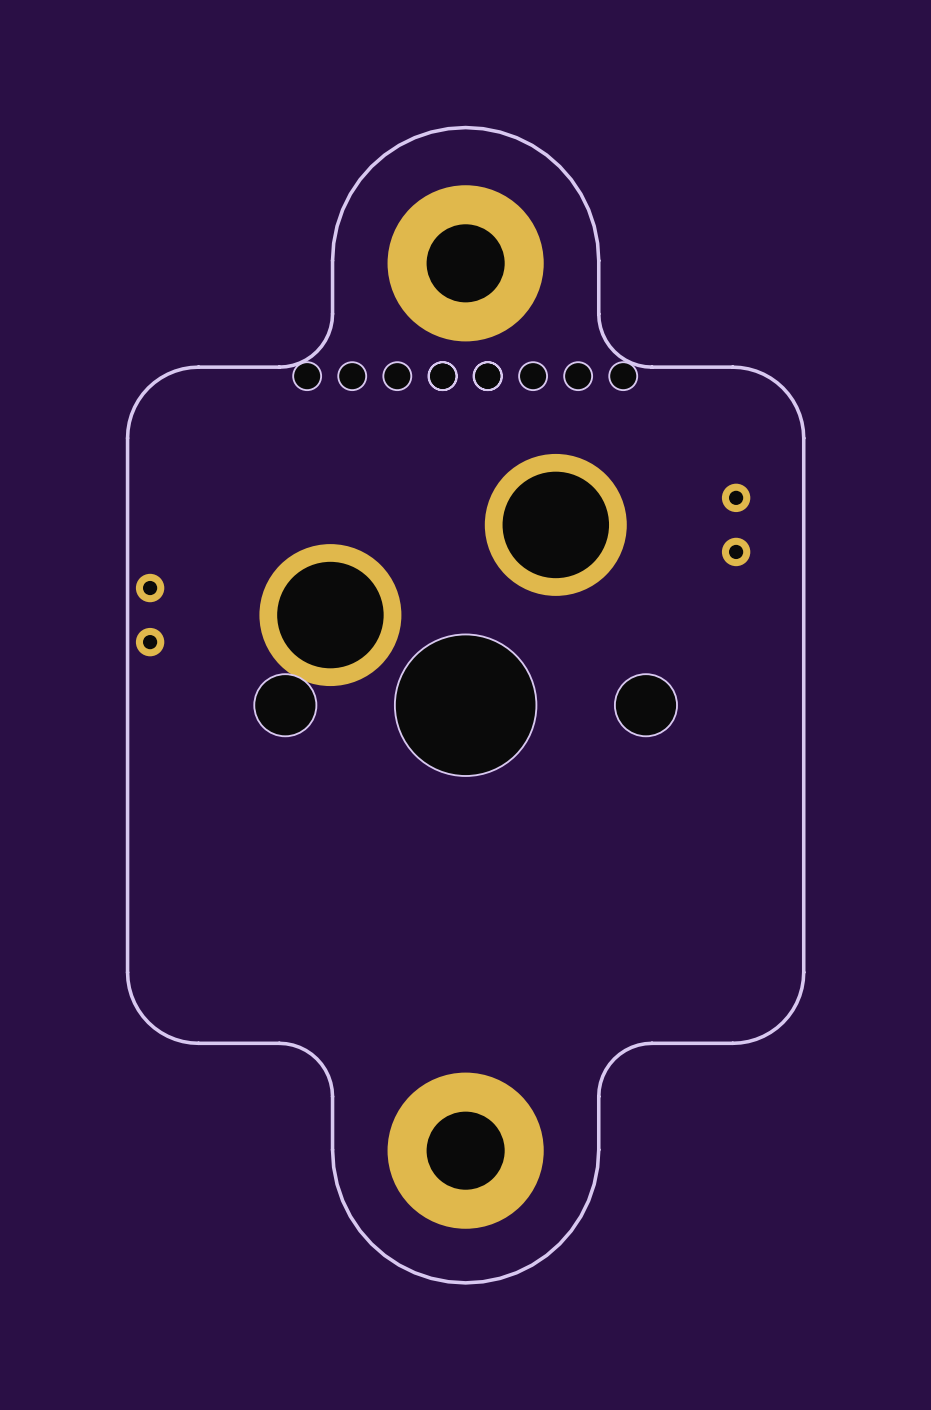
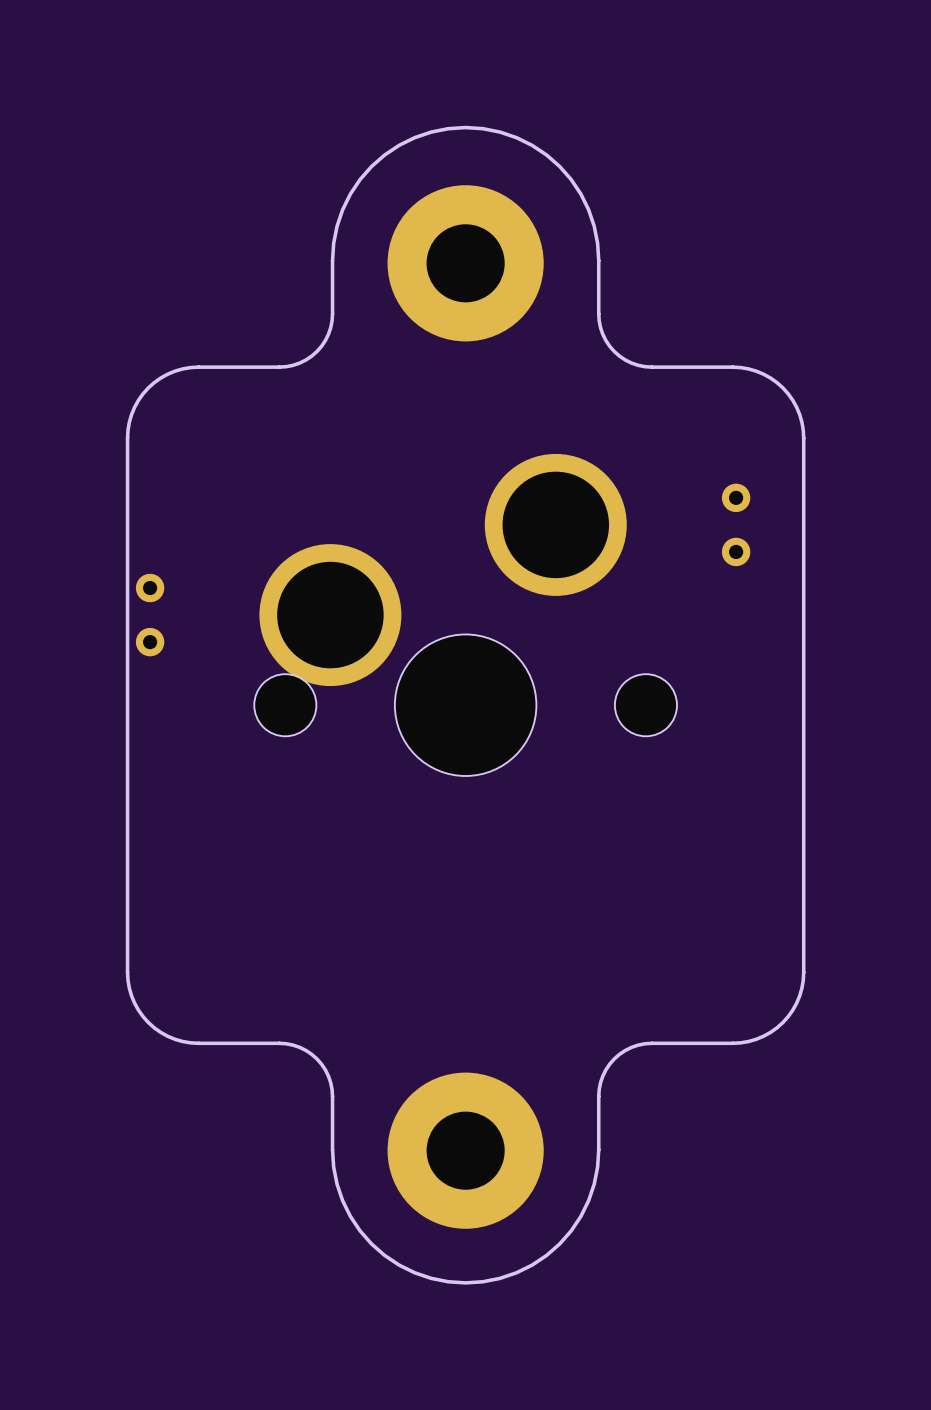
part: (397, 376) -> none
part: (533, 376) -> none

